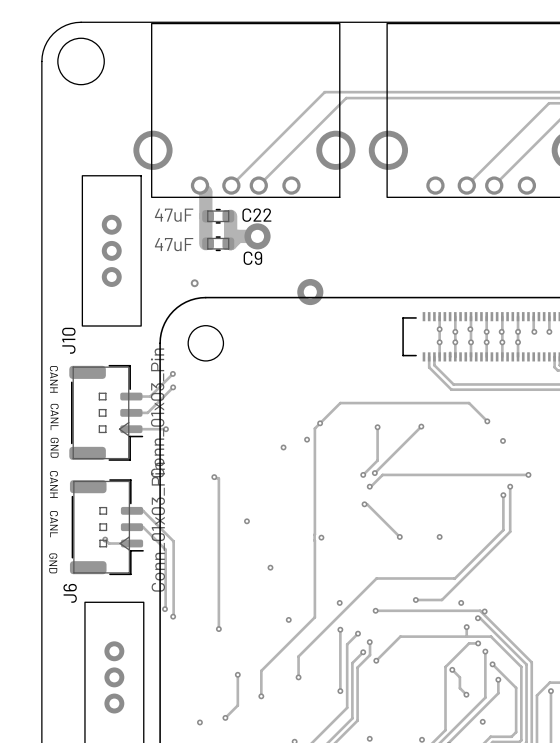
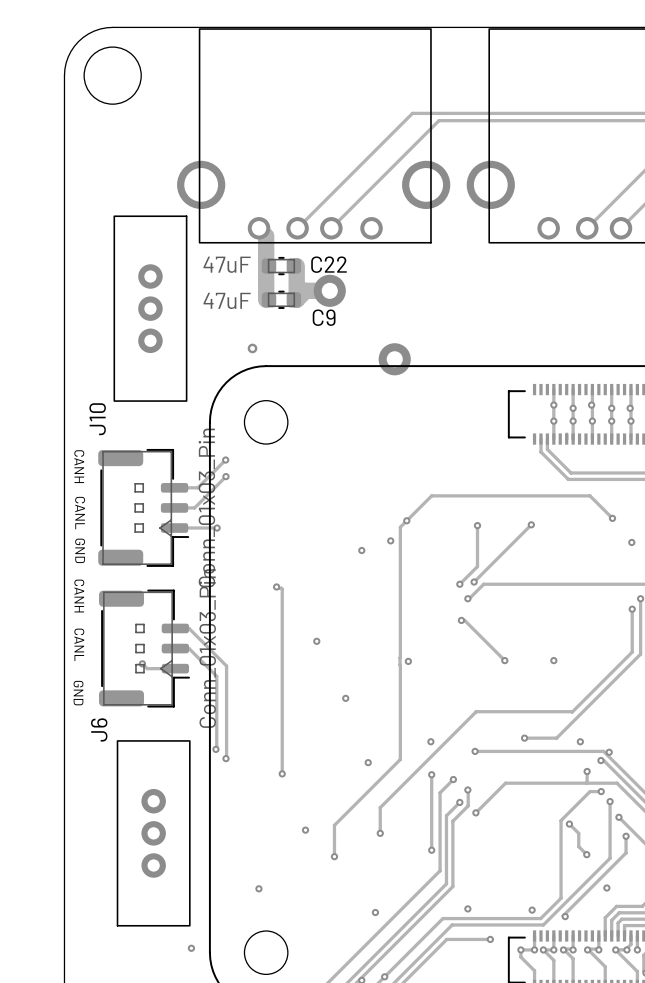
track: (237, 674) (237, 705) (225, 717) -> none
via: (225, 717) -> none

